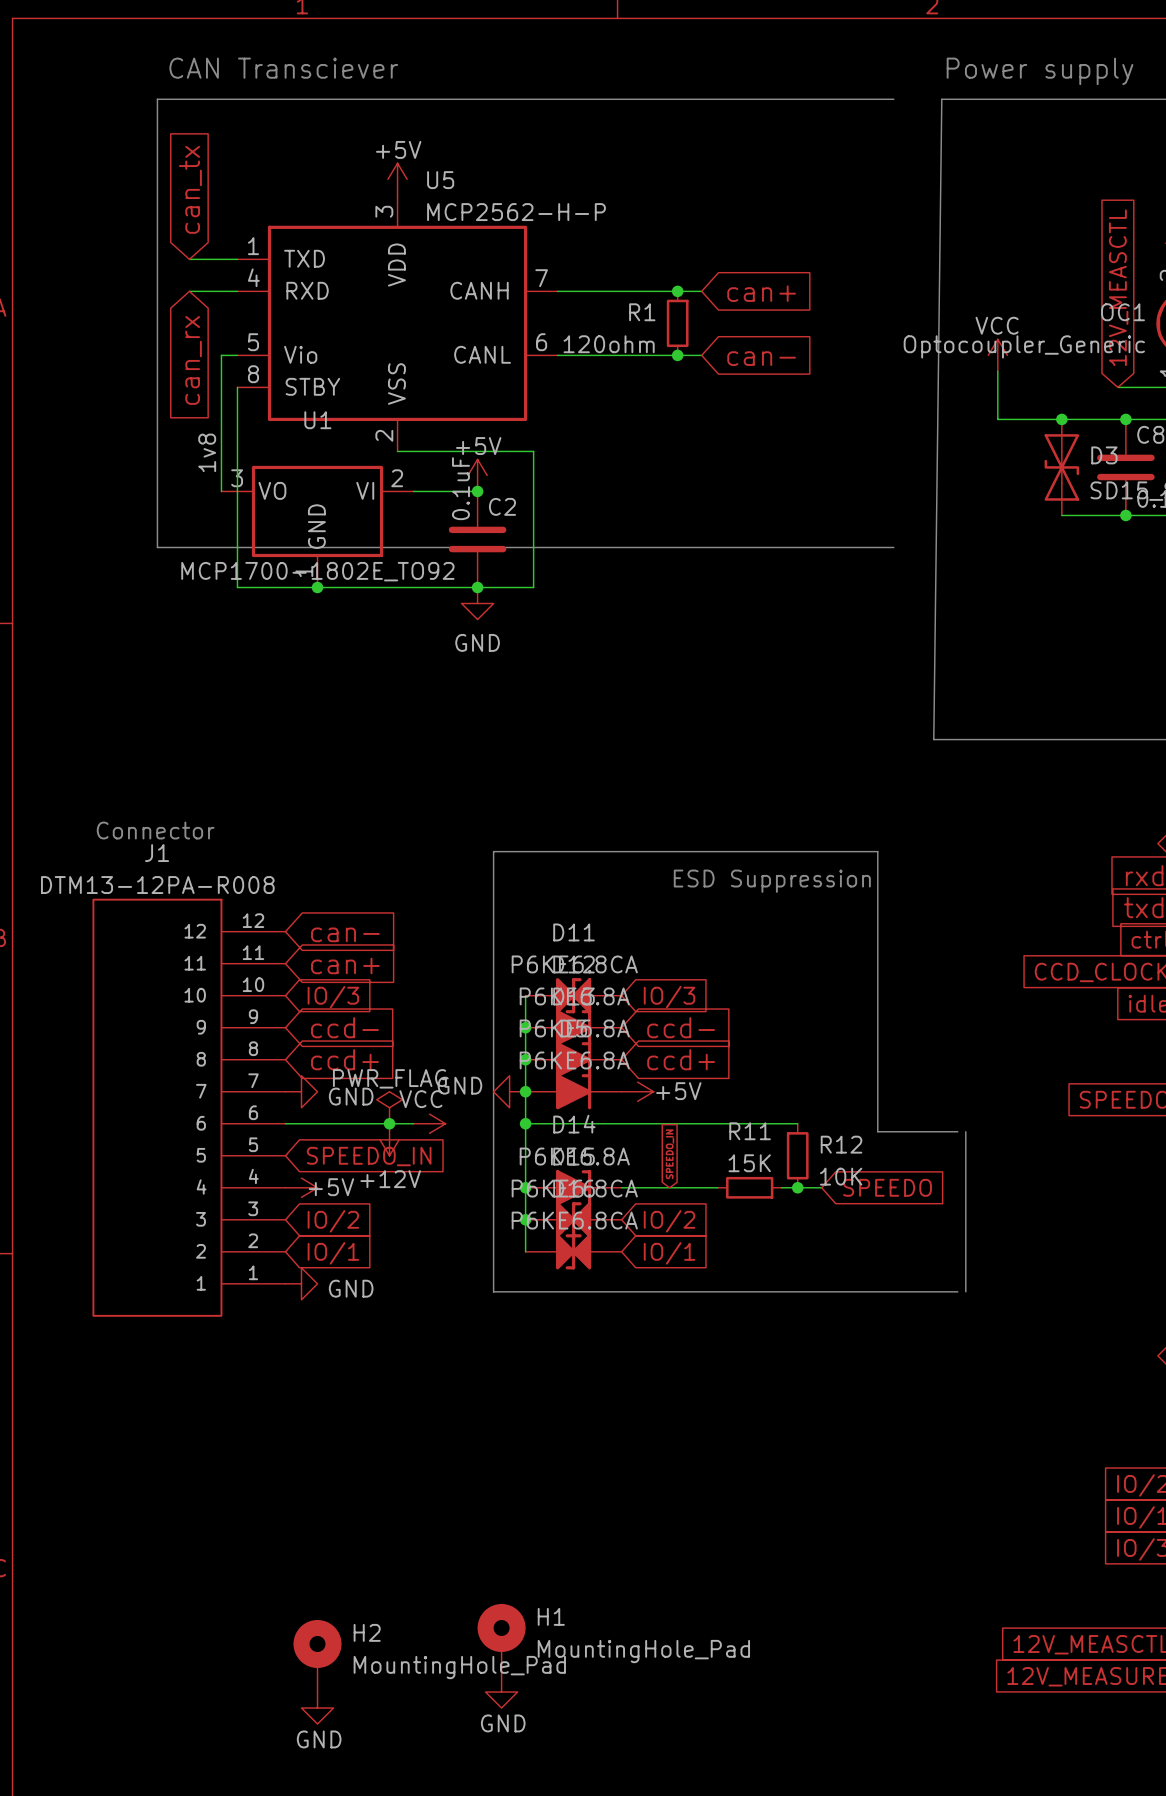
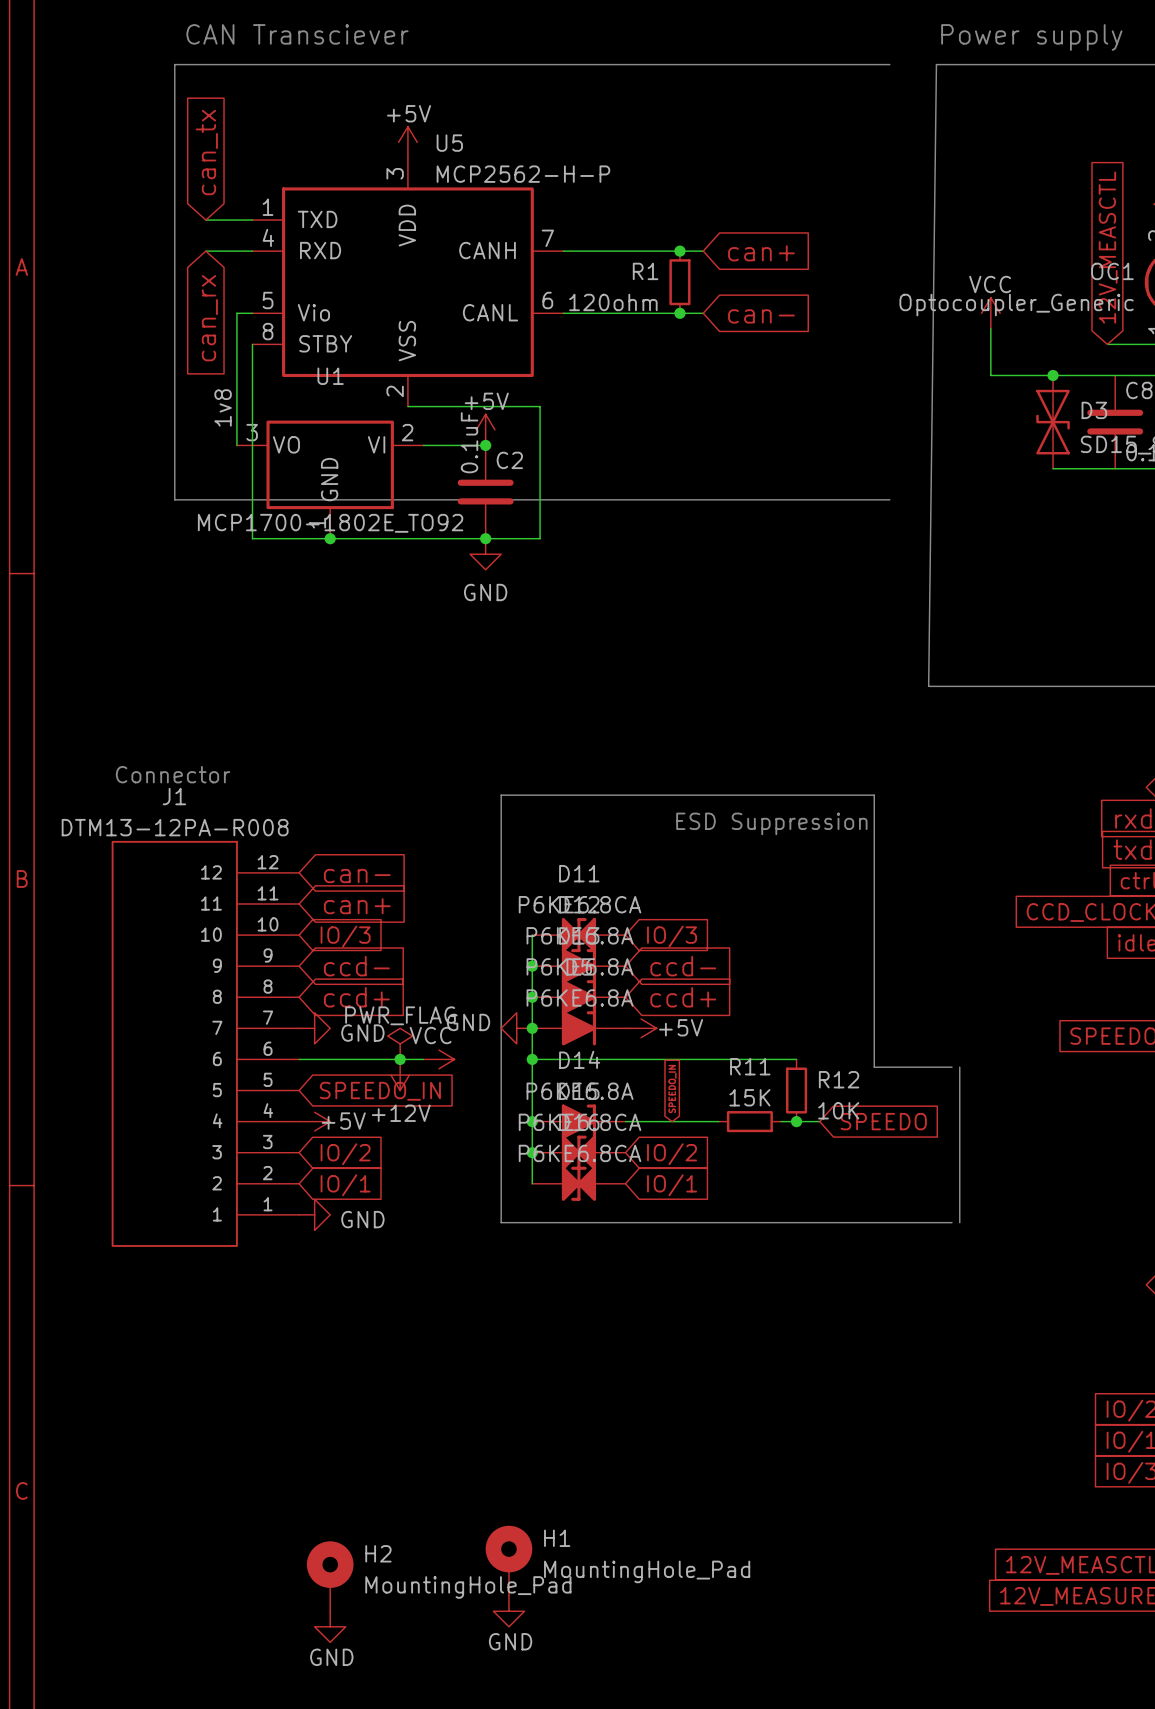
junction: (1125, 419) -> none
junction: (1125, 515) -> none

